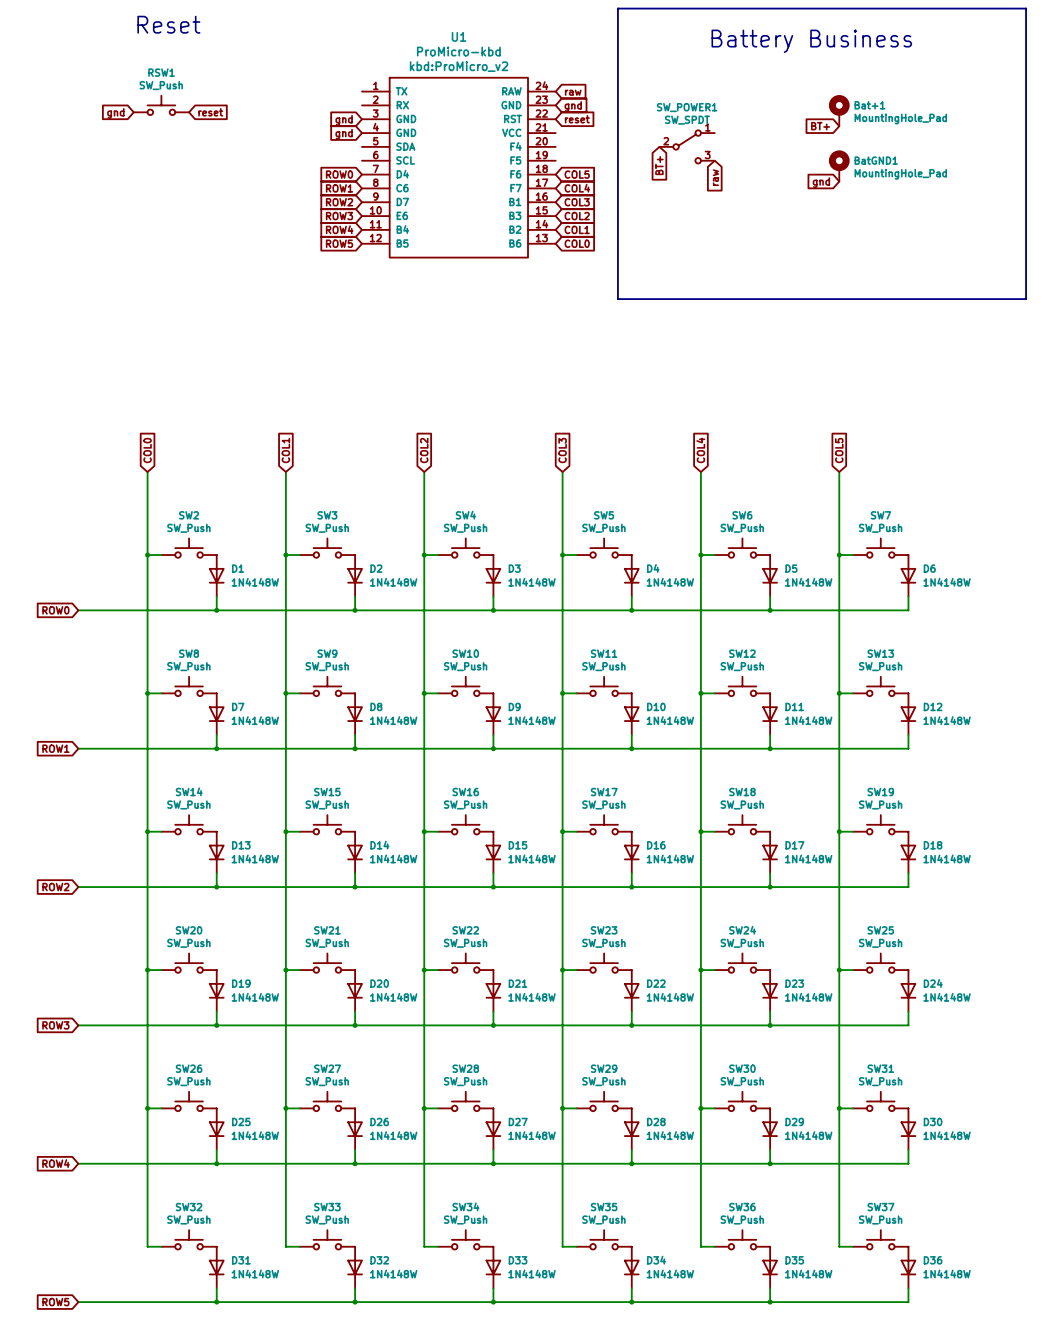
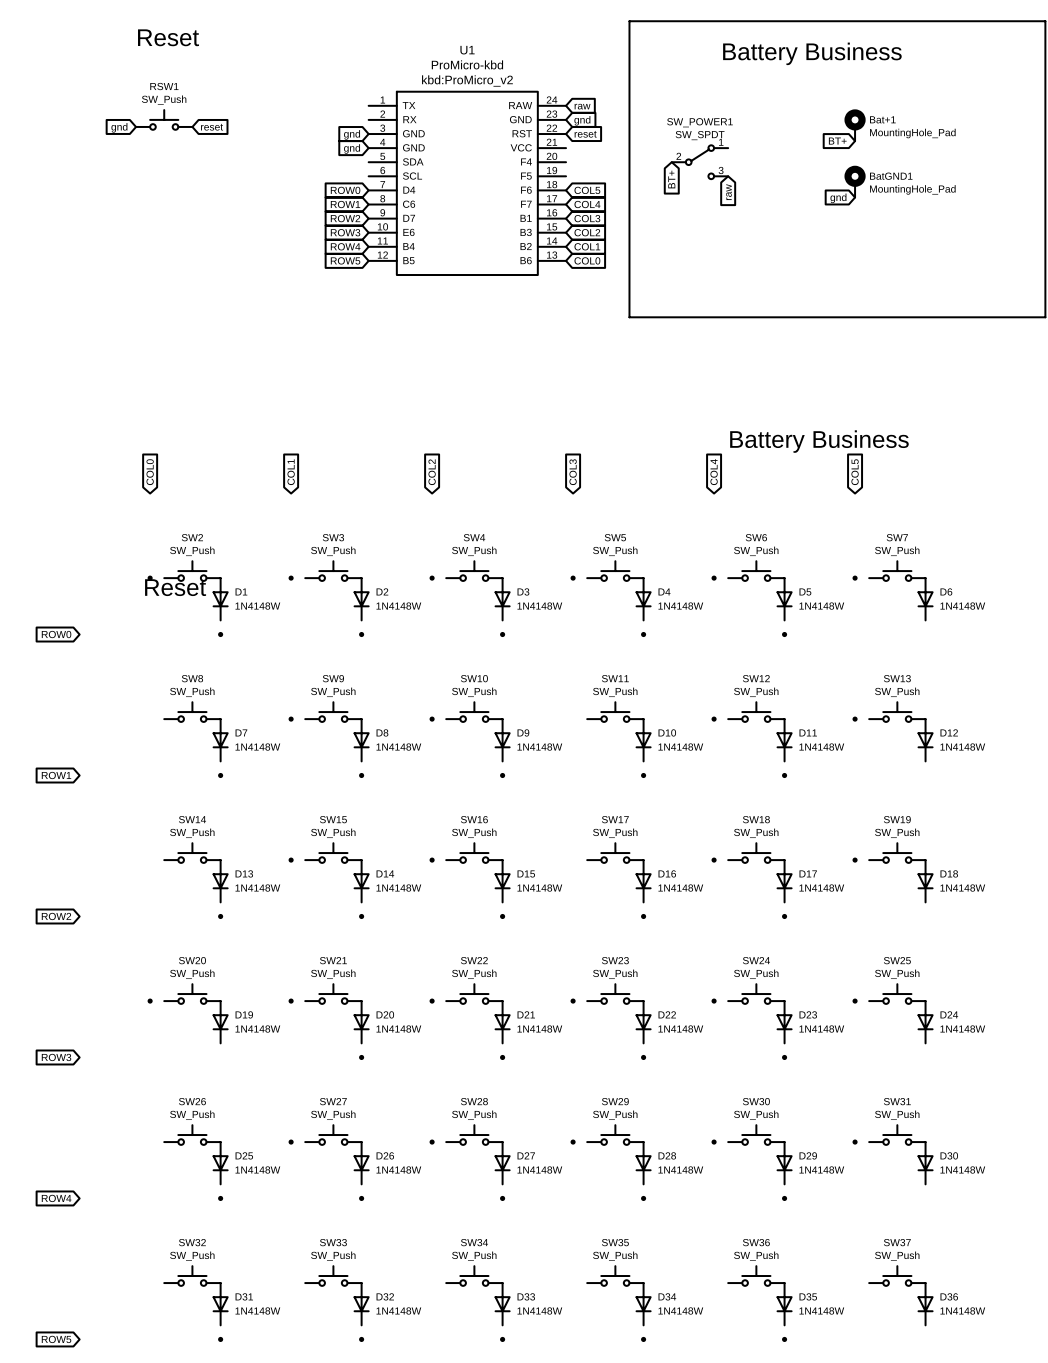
text: none -> Battery Business (819, 441)
wire: (147, 472) (147, 1246) (161, 1246) -> none
wire: (285, 472) (285, 1246) (299, 1246) -> none
wire: (424, 472) (424, 1246) (438, 1246) -> none
wire: (562, 472) (562, 1246) (576, 1246) -> none
wire: (700, 472) (700, 1246) (714, 1246) -> none
wire: (839, 472) (839, 1246) (853, 1246) -> none
wire: (147, 555) (161, 555) -> none
wire: (285, 555) (299, 555) -> none
wire: (424, 555) (438, 555) -> none
wire: (562, 555) (576, 555) -> none
wire: (700, 555) (714, 555) -> none
wire: (839, 555) (853, 555) -> none
text: none -> Reset (175, 587)
wire: (216, 596) (216, 610) -> none
wire: (355, 596) (355, 610) -> none
wire: (493, 596) (493, 610) -> none
wire: (631, 596) (631, 610) -> none
wire: (770, 596) (770, 610) -> none
wire: (908, 596) (908, 610) (78, 610) -> none
wire: (147, 693) (161, 693) -> none
junction: (147, 693) -> none
wire: (285, 693) (299, 693) -> none
wire: (424, 693) (438, 693) -> none
wire: (562, 693) (576, 693) -> none
junction: (562, 693) -> none
wire: (700, 693) (714, 693) -> none
wire: (839, 693) (853, 693) -> none
wire: (216, 734) (216, 748) -> none
wire: (355, 734) (355, 748) -> none
wire: (493, 734) (493, 748) -> none
wire: (631, 734) (631, 748) -> none
wire: (770, 734) (770, 748) -> none
wire: (908, 734) (908, 748) (78, 748) -> none
wire: (147, 831) (161, 831) -> none
junction: (147, 831) -> none
wire: (285, 831) (299, 831) -> none
wire: (424, 831) (438, 831) -> none
wire: (562, 831) (576, 831) -> none
junction: (562, 831) -> none
wire: (700, 831) (714, 831) -> none
wire: (839, 831) (853, 831) -> none
wire: (216, 873) (216, 887) -> none
wire: (355, 873) (355, 887) -> none
wire: (493, 873) (493, 887) -> none
wire: (631, 873) (631, 887) -> none
wire: (770, 873) (770, 887) -> none
wire: (908, 873) (908, 887) (78, 887) -> none
wire: (147, 970) (161, 970) -> none
wire: (285, 970) (299, 970) -> none
wire: (424, 970) (438, 970) -> none
wire: (562, 970) (576, 970) -> none
wire: (700, 970) (714, 970) -> none
wire: (839, 970) (853, 970) -> none
wire: (216, 1011) (216, 1025) -> none
wire: (355, 1011) (355, 1025) -> none
wire: (493, 1011) (493, 1025) -> none
wire: (631, 1011) (631, 1025) -> none
wire: (770, 1011) (770, 1025) -> none
wire: (908, 1011) (908, 1025) (78, 1025) -> none
junction: (216, 1025) -> none
wire: (147, 1108) (161, 1108) -> none
junction: (147, 1108) -> none
wire: (285, 1108) (299, 1108) -> none
wire: (424, 1108) (438, 1108) -> none
wire: (562, 1108) (576, 1108) -> none
wire: (700, 1108) (714, 1108) -> none
wire: (839, 1108) (853, 1108) -> none
wire: (216, 1149) (216, 1163) -> none
wire: (355, 1149) (355, 1163) -> none
wire: (493, 1149) (493, 1163) -> none
wire: (631, 1149) (631, 1163) -> none
wire: (770, 1149) (770, 1163) -> none
wire: (908, 1149) (908, 1163) (78, 1163) -> none
wire: (216, 1288) (216, 1302) -> none
wire: (355, 1288) (355, 1302) -> none
wire: (493, 1288) (493, 1302) -> none
wire: (631, 1288) (631, 1302) -> none
wire: (770, 1288) (770, 1302) -> none
wire: (908, 1288) (908, 1302) (78, 1302) -> none

